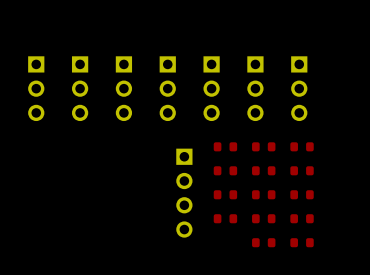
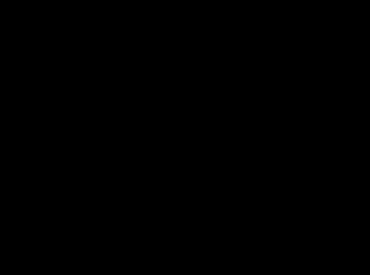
part: (36, 88) -> none
part: (80, 88) -> none
part: (123, 88) -> none
part: (167, 88) -> none
part: (211, 88) -> none
part: (255, 88) -> none
part: (299, 88) -> none
part: (225, 146) -> none
part: (263, 146) -> none
part: (302, 146) -> none
part: (225, 170) -> none
part: (263, 170) -> none
part: (302, 170) -> none
part: (184, 193) -> none
part: (225, 194) -> none
part: (263, 194) -> none
part: (302, 194) -> none
part: (225, 218) -> none
part: (263, 218) -> none
part: (302, 218) -> none
part: (263, 242) -> none
part: (302, 242) -> none

